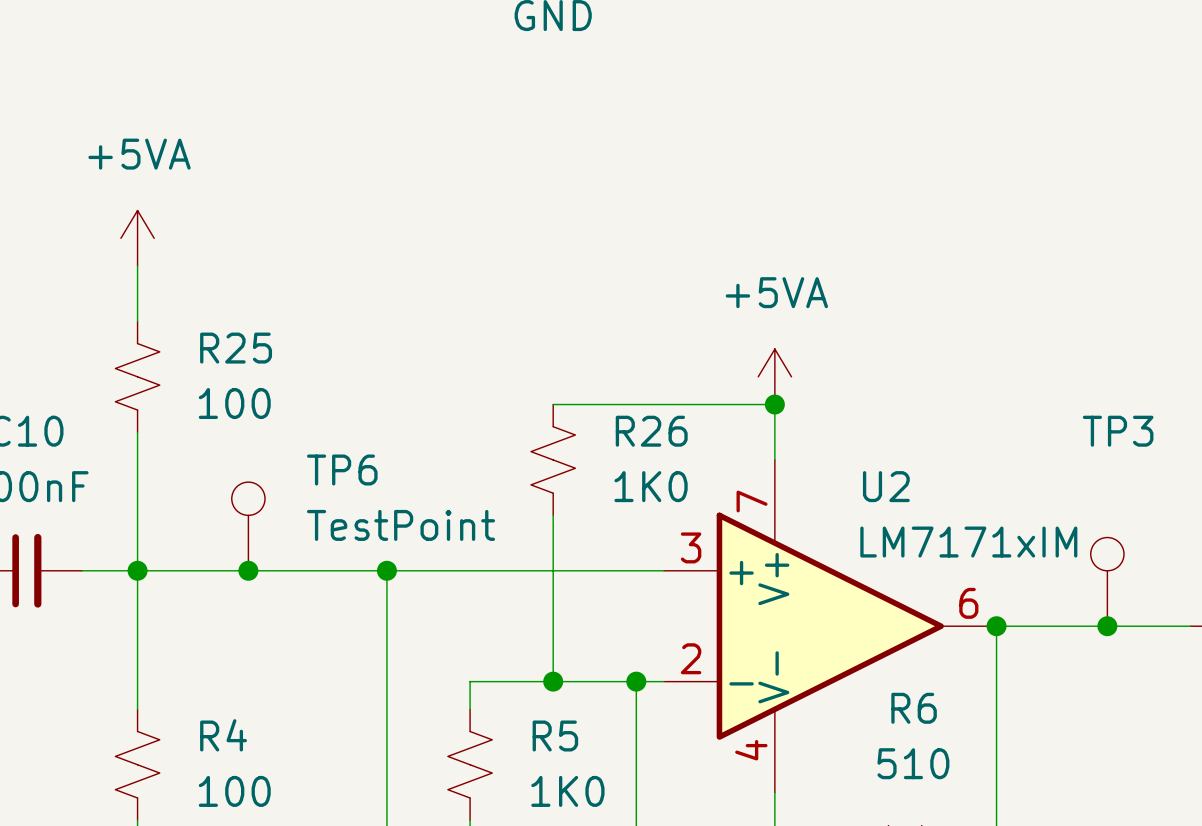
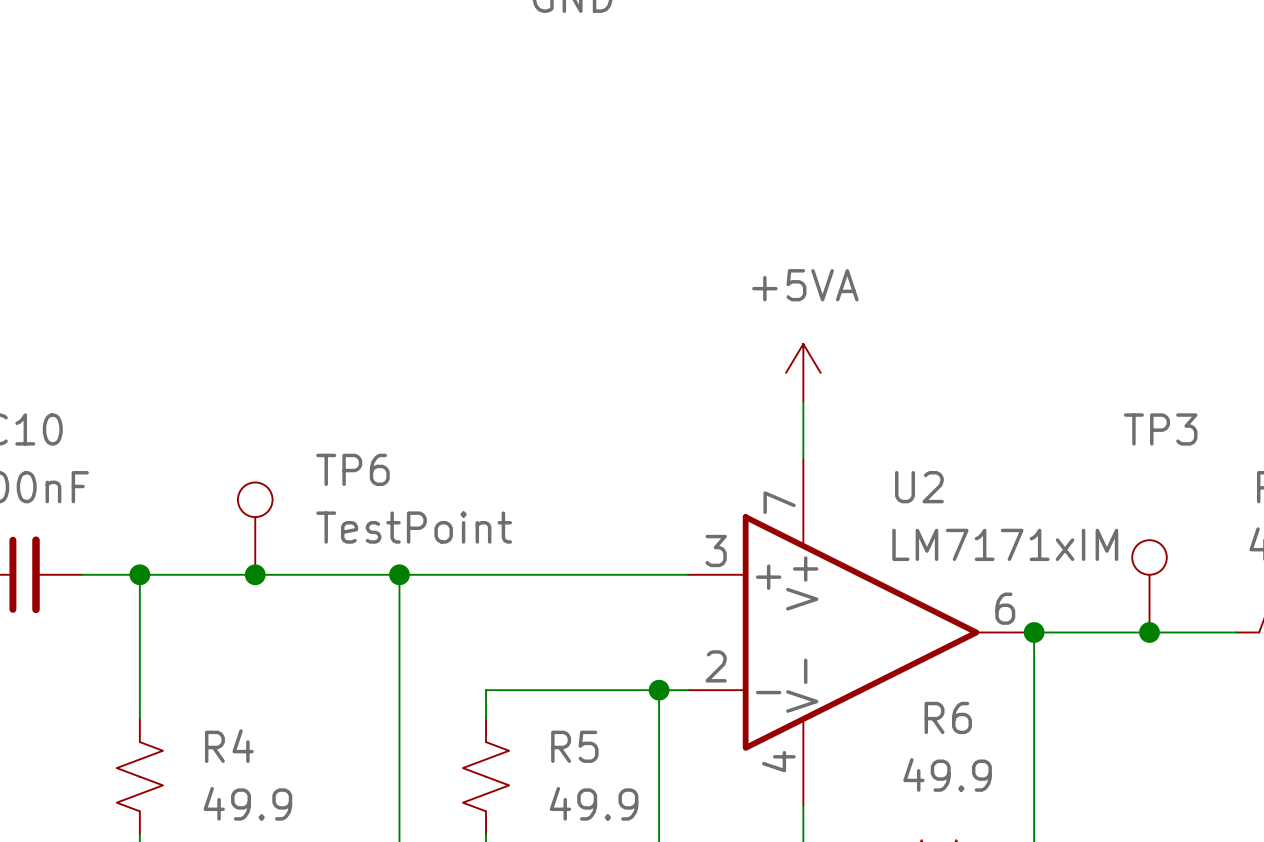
power symbol: +5VA (137, 238) -> none
wire: (137, 265) (137, 321) -> none
R25: 100 (137, 376) -> none
wire: (553, 404) (774, 404) -> none
junction: (774, 404) -> none
wire: (137, 432) (137, 570) -> none
R26: 1K0 (553, 459) -> none
wire: (553, 515) (553, 681) -> none
junction: (553, 681) -> none
R6 value: 510 (913, 763) -> 49.9 (947, 774)
R4 value: 100 (234, 791) -> 49.9 (247, 803)
R5 value: 1K0 (567, 791) -> 49.9 (594, 803)

